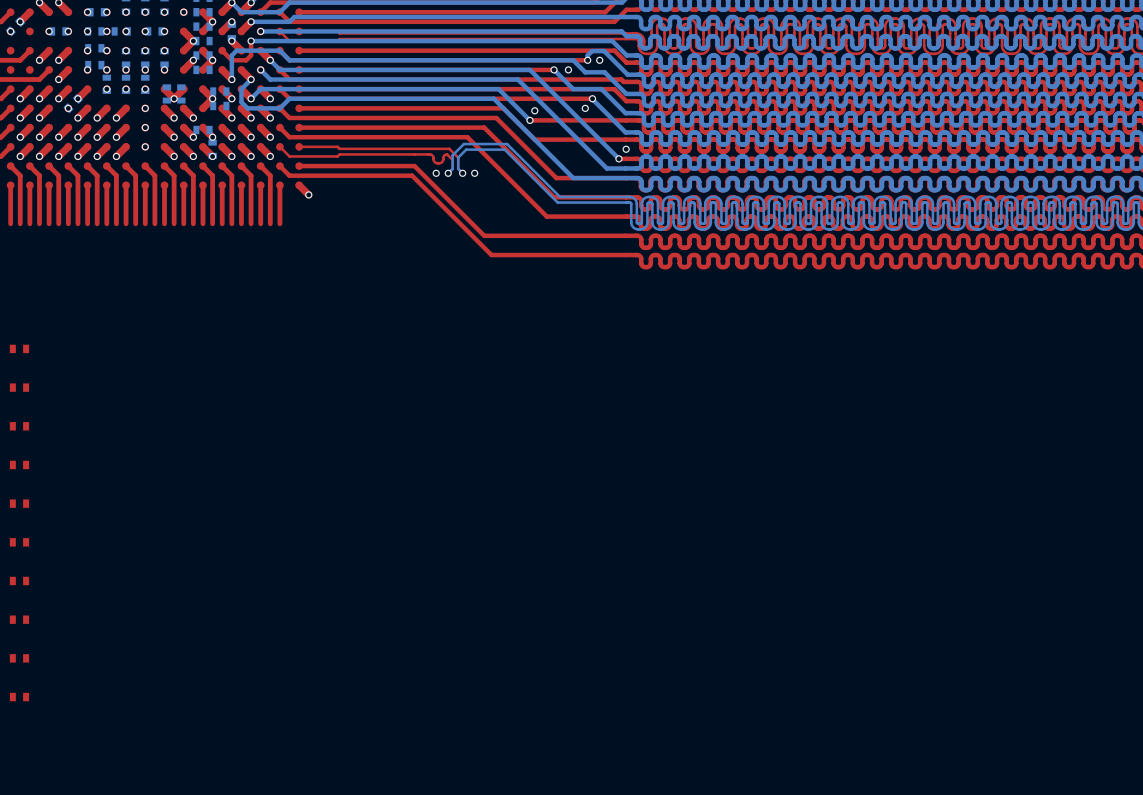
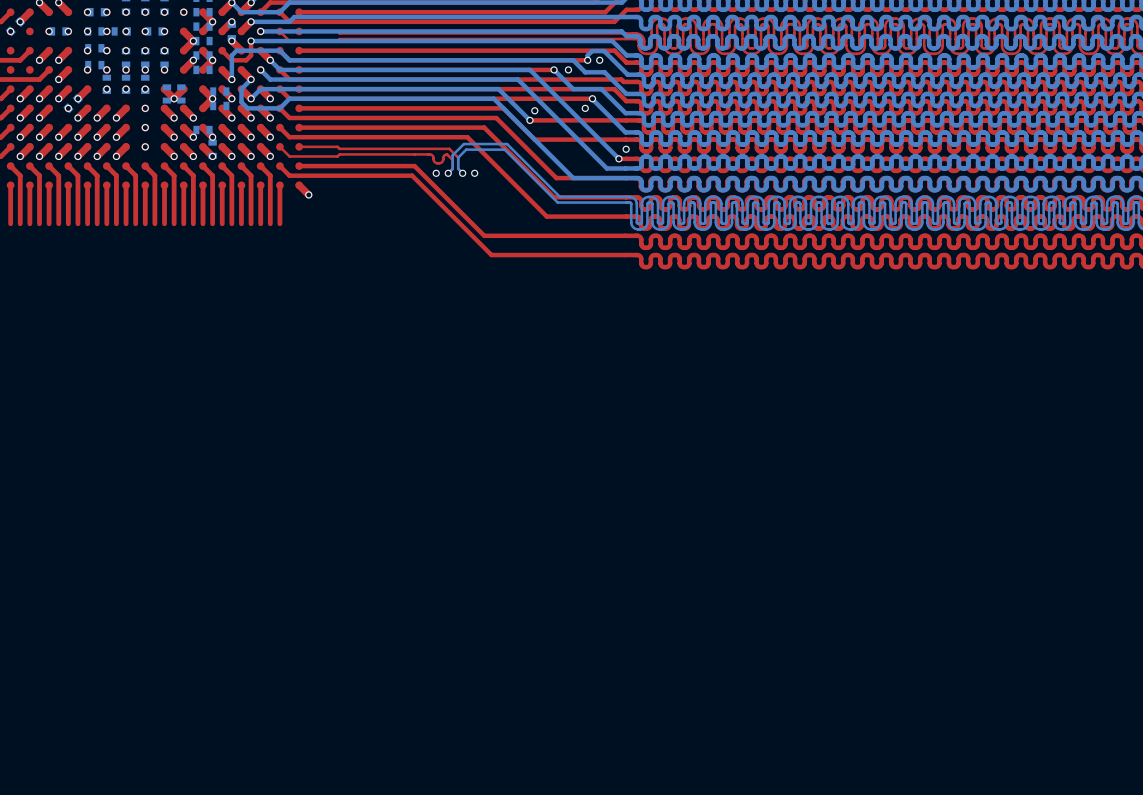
part: (19, 348) -> none
part: (19, 387) -> none
part: (19, 426) -> none
part: (19, 464) -> none
part: (19, 503) -> none
part: (19, 542) -> none
part: (19, 581) -> none
part: (19, 619) -> none
part: (19, 658) -> none
part: (19, 697) -> none

